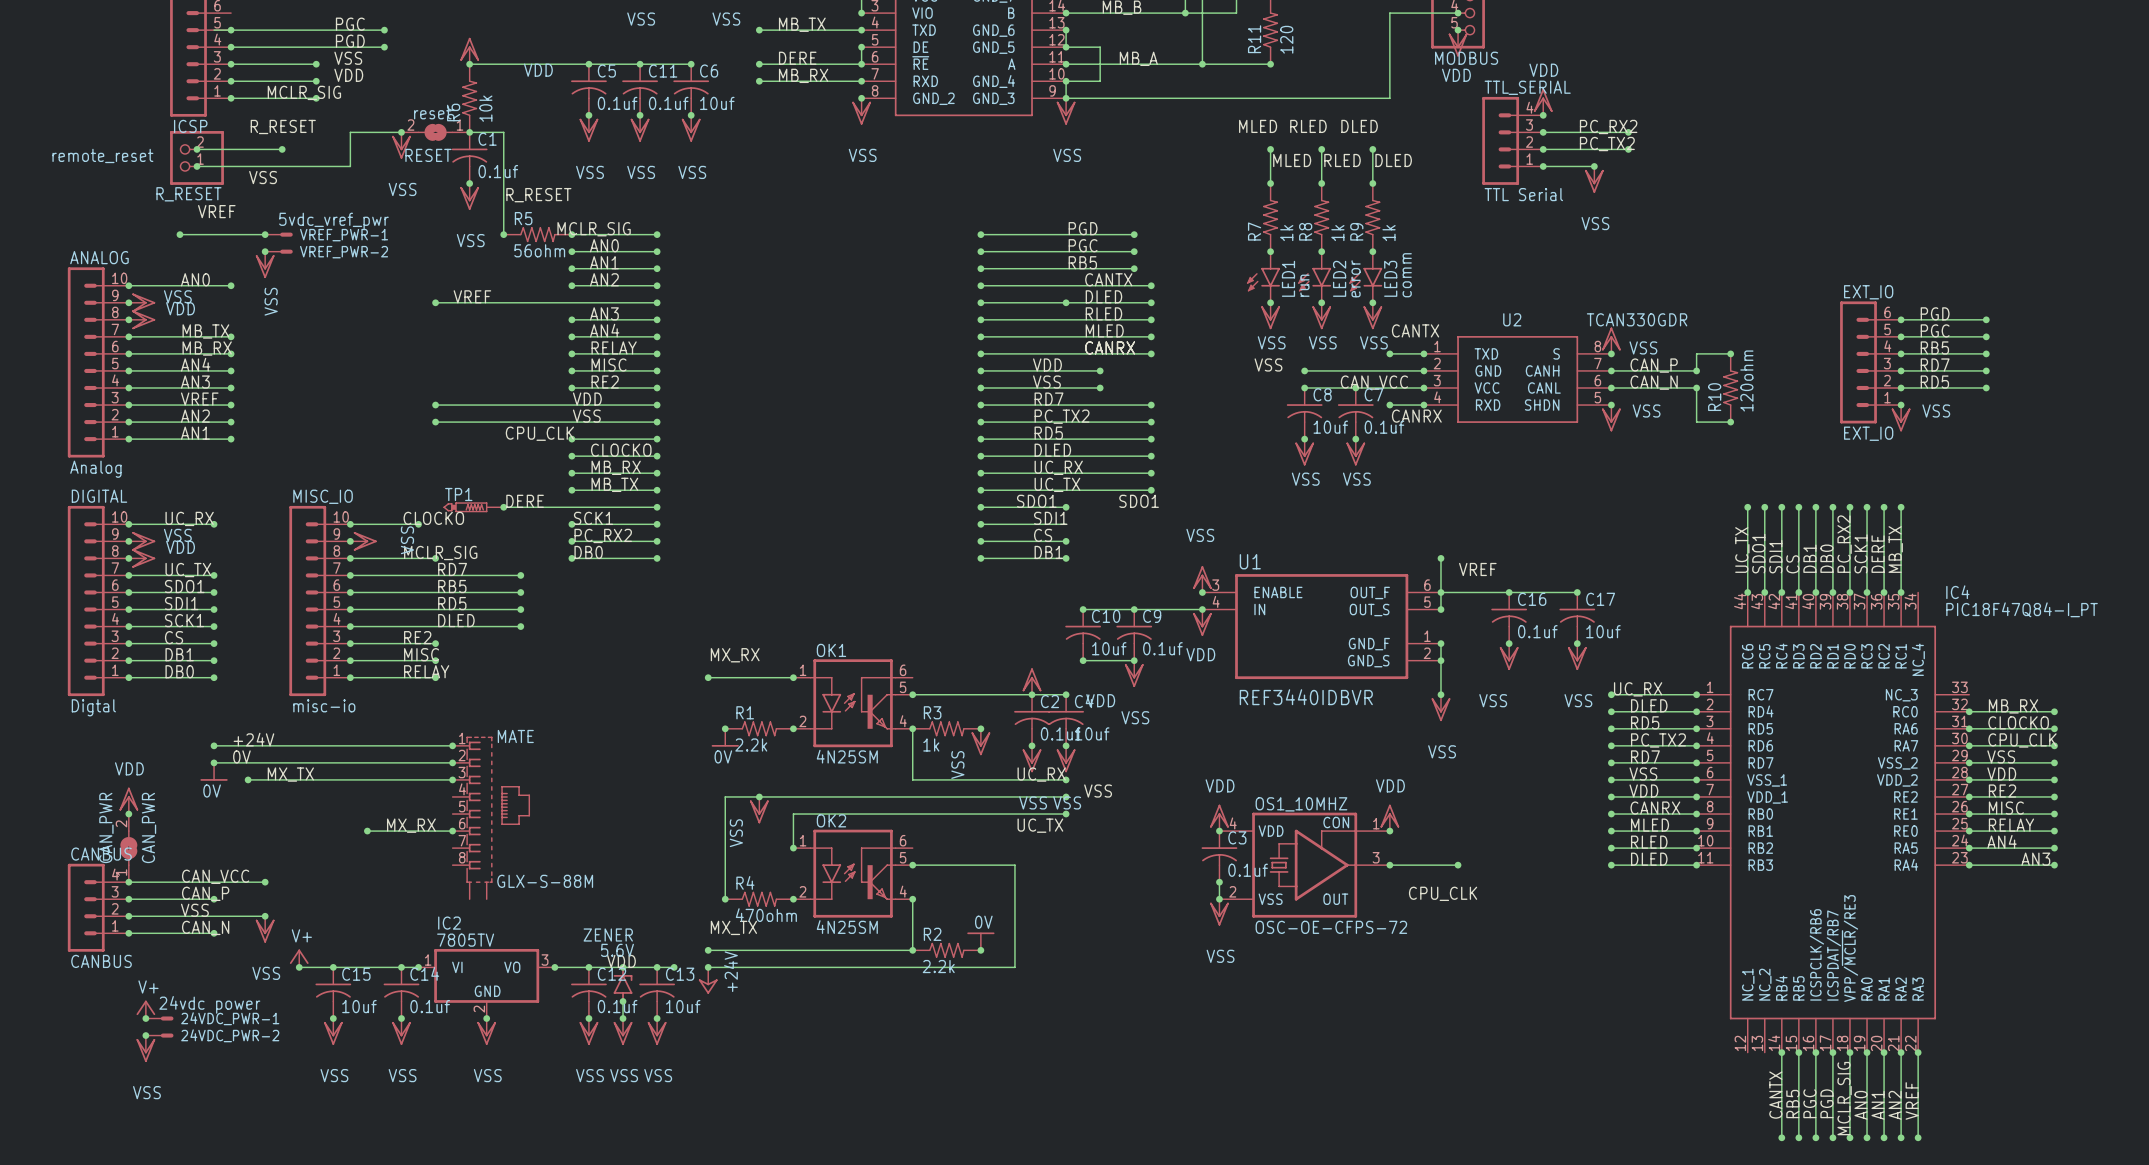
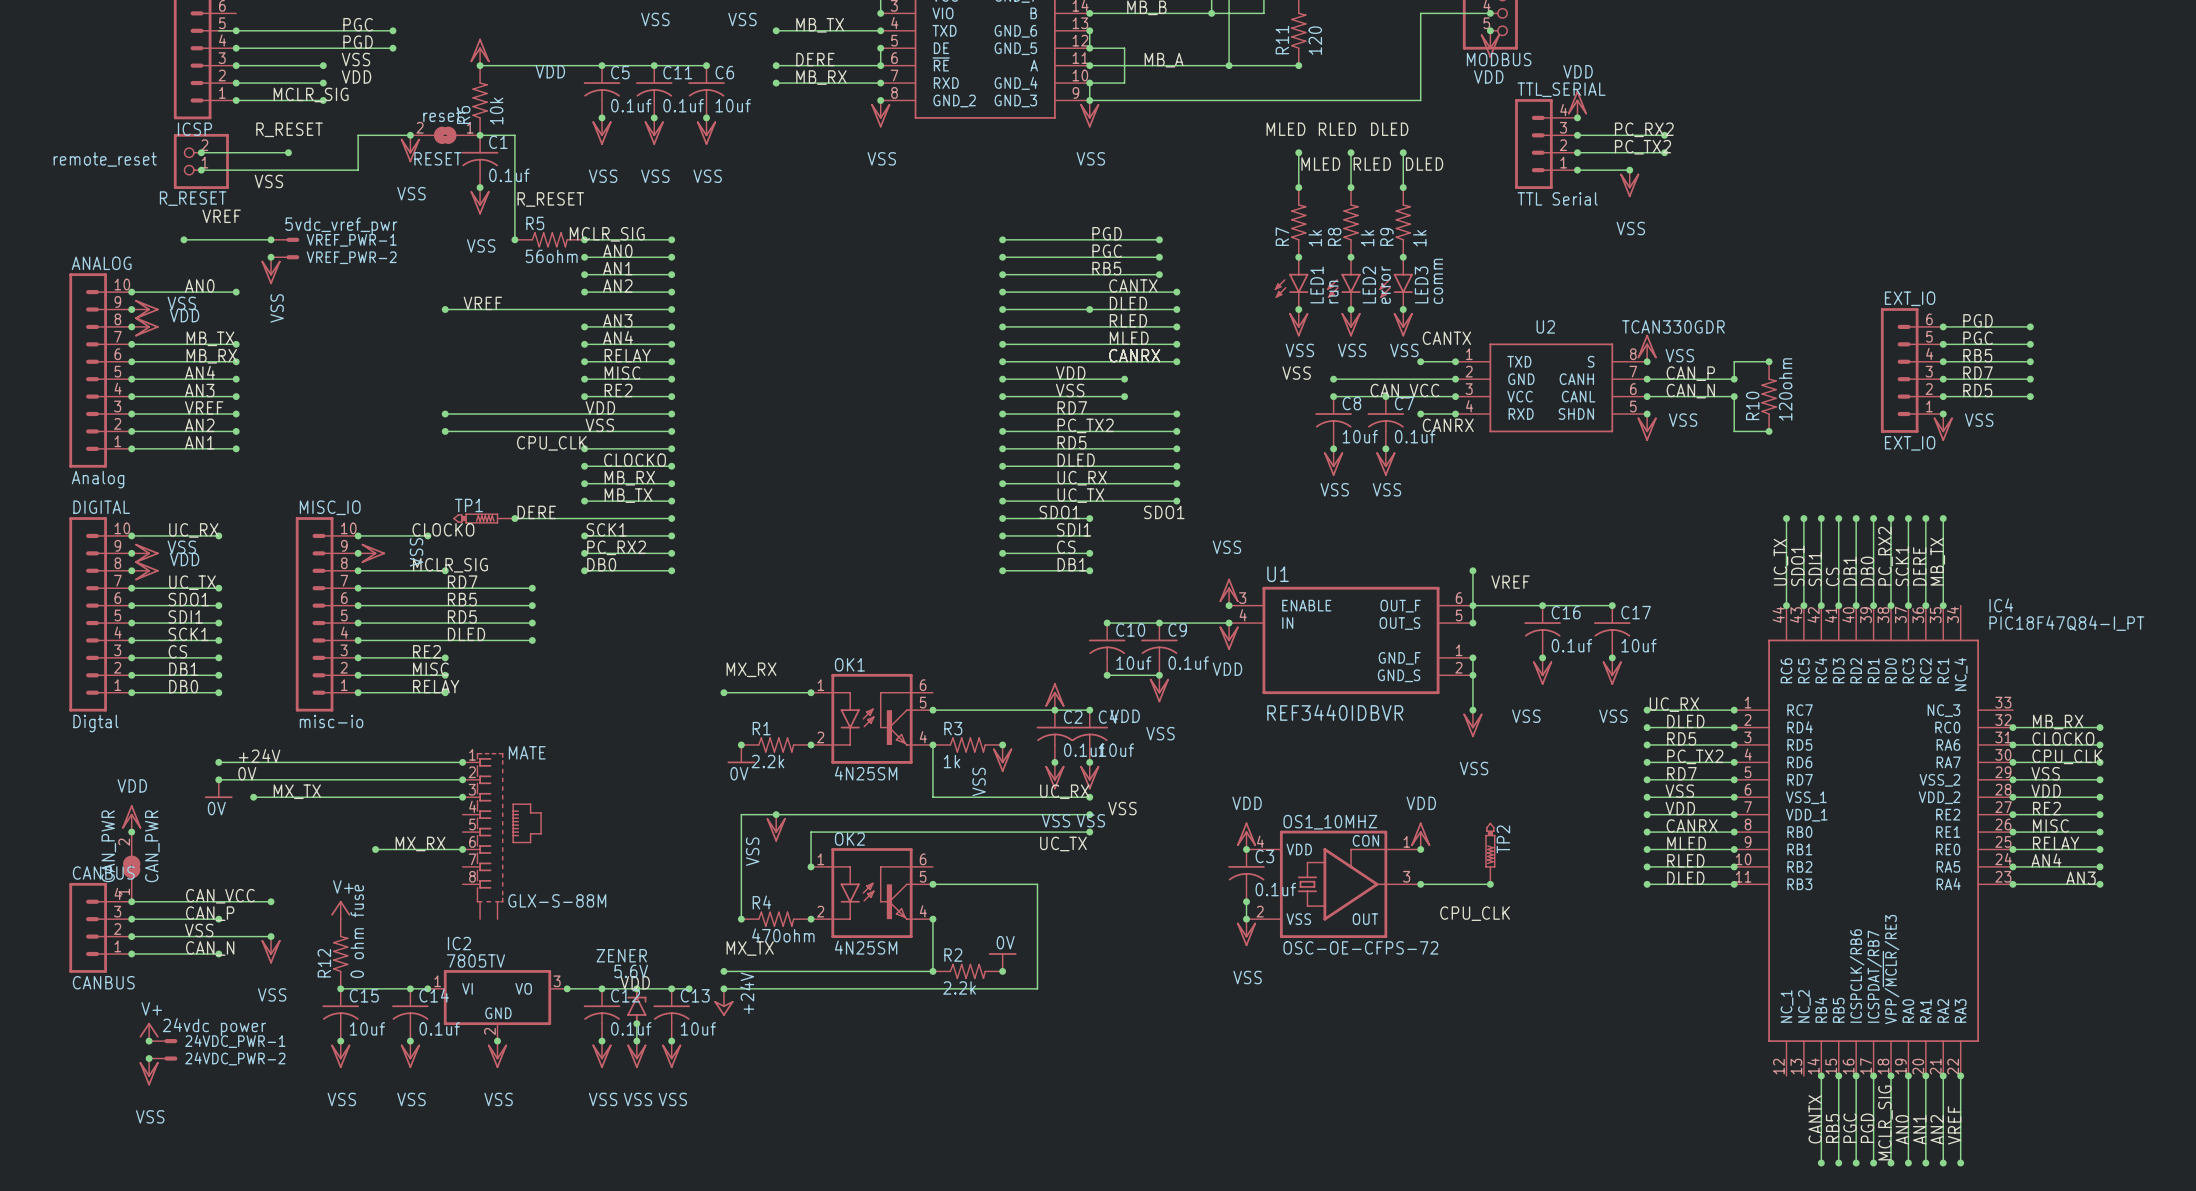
TP2: none -> (1490, 853)
R12: none -> 0 ohm fuse (340, 954)
power symbol position: V+ (299, 958) -> V+ (340, 910)
wire: (299, 967) (333, 967) -> none
junction: (299, 967) -> none

